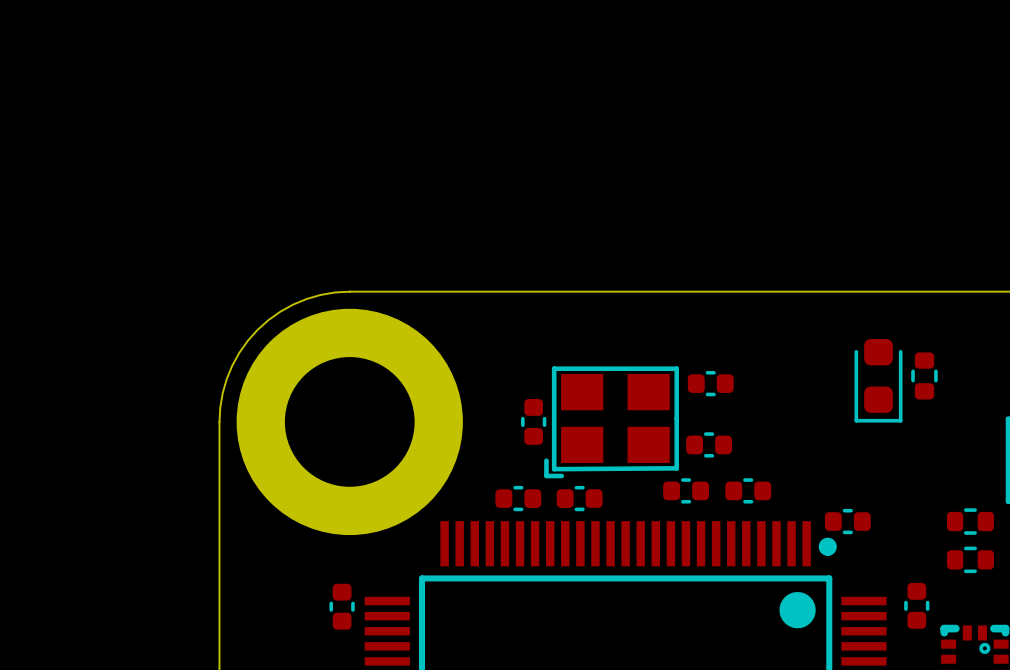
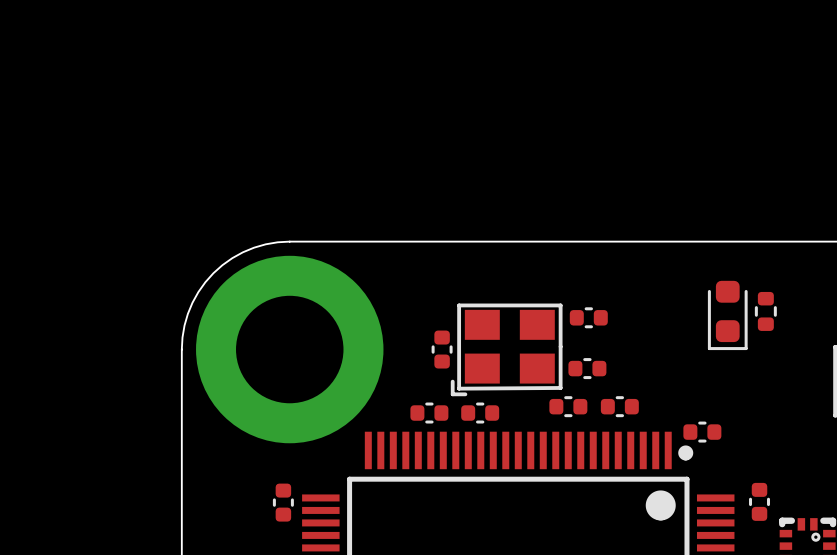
part: (970, 521) -> none
part: (970, 559) -> none

